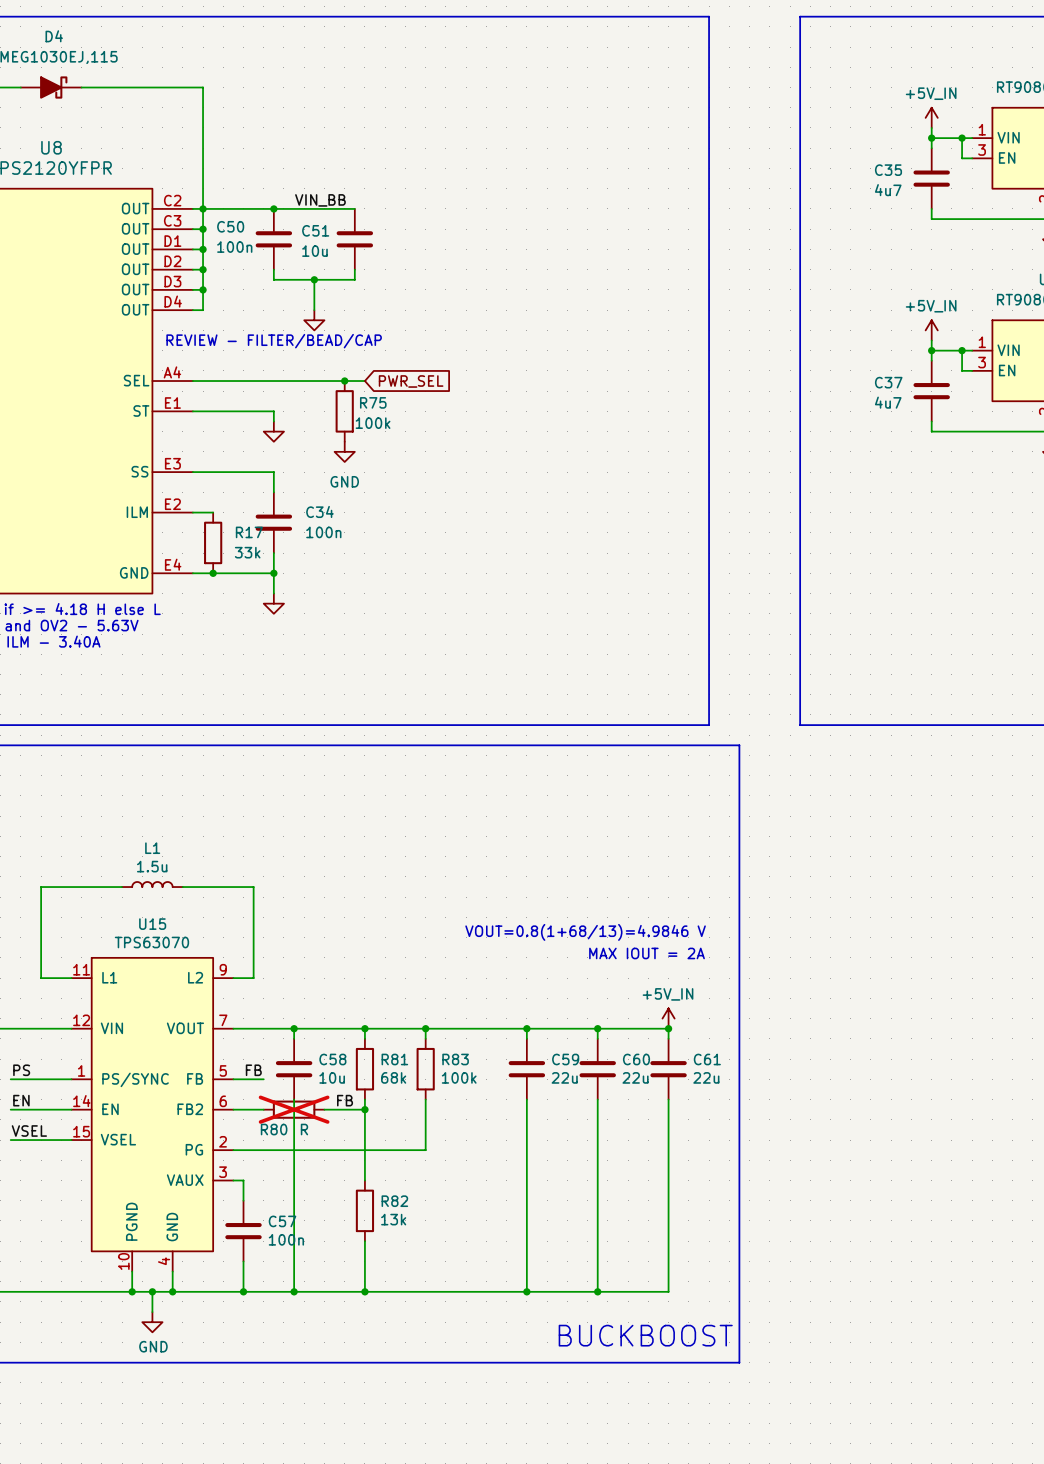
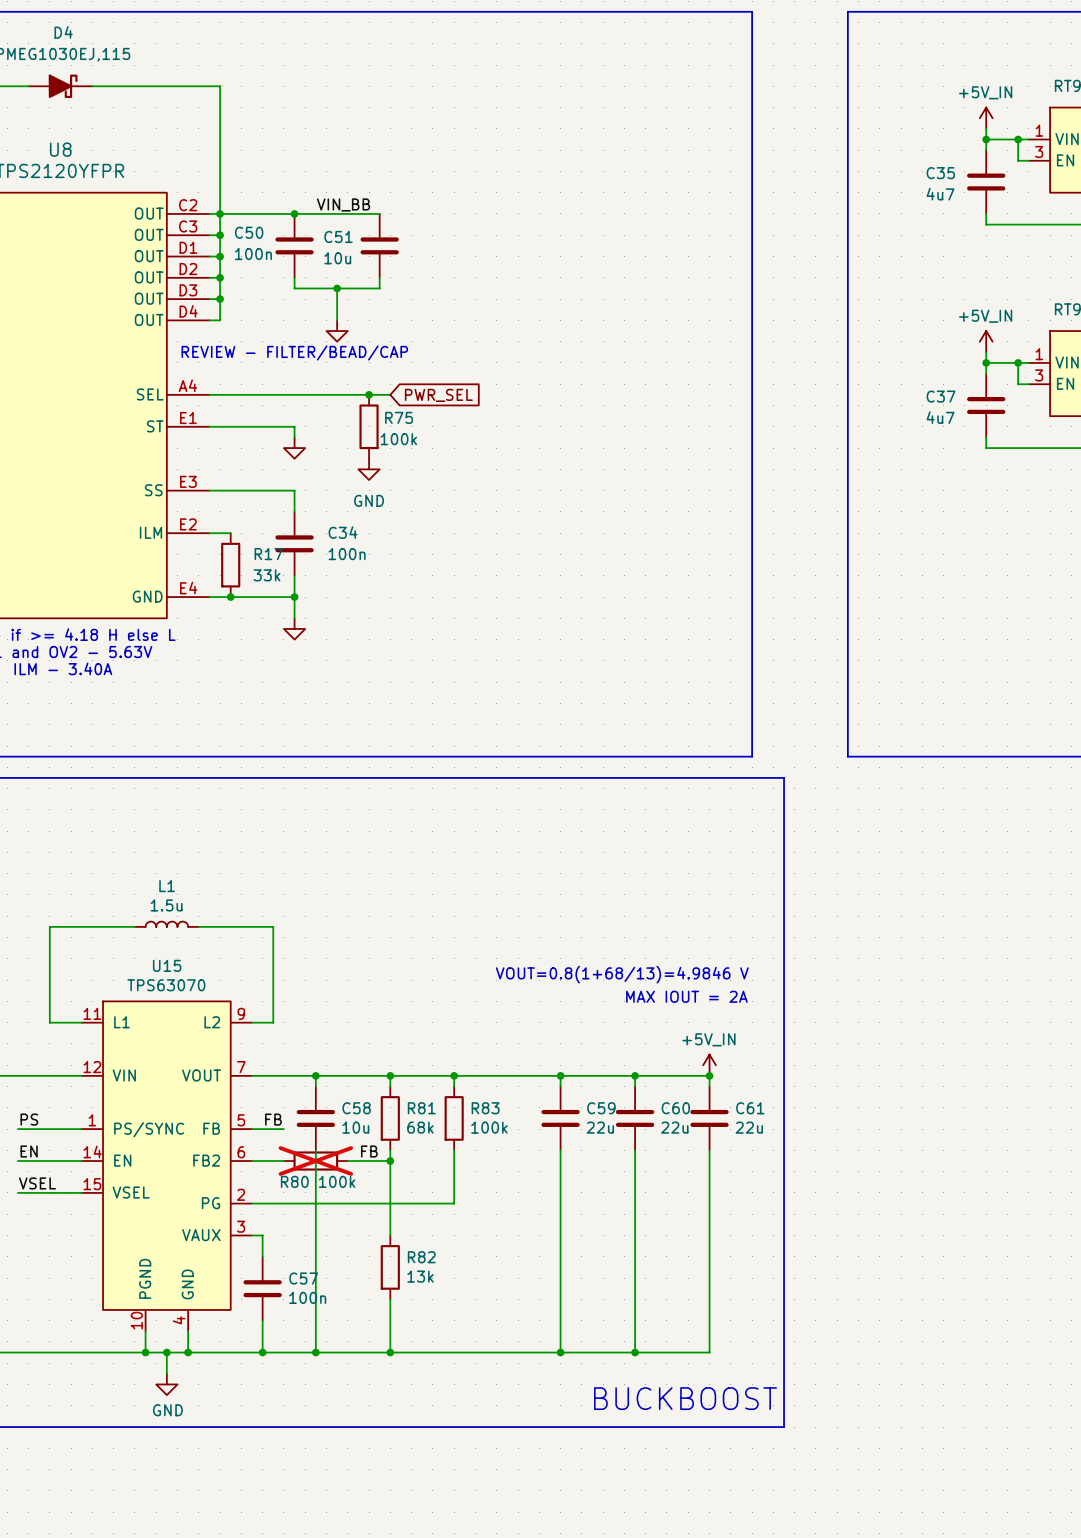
R80 value: R (304, 1129) -> 100k (337, 1181)

